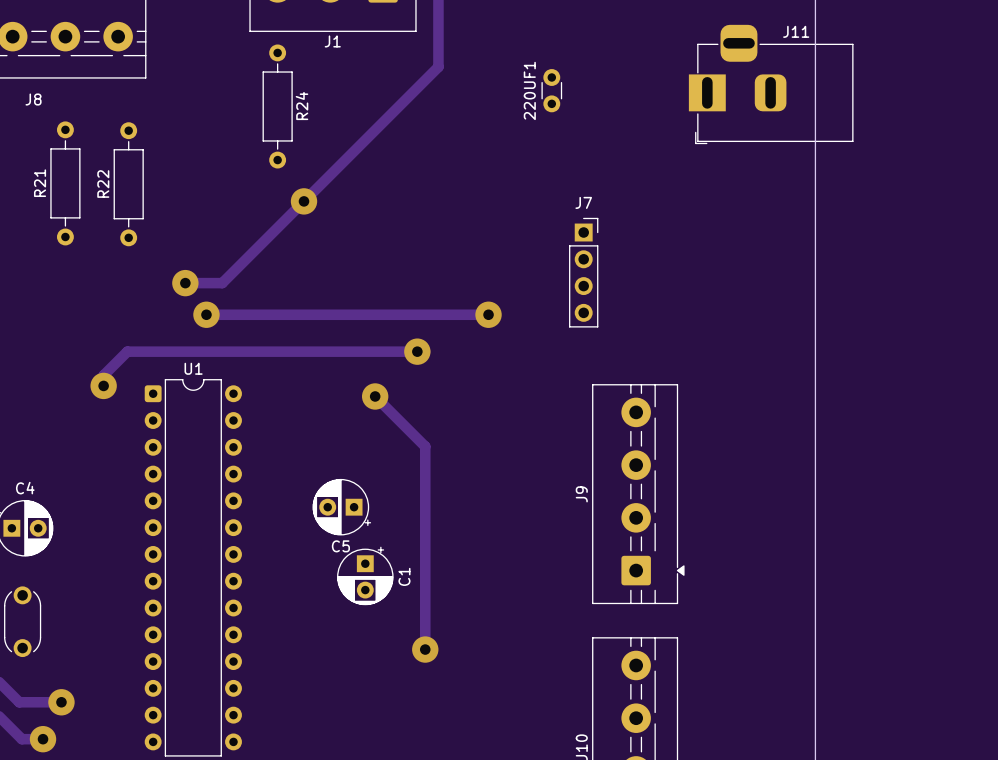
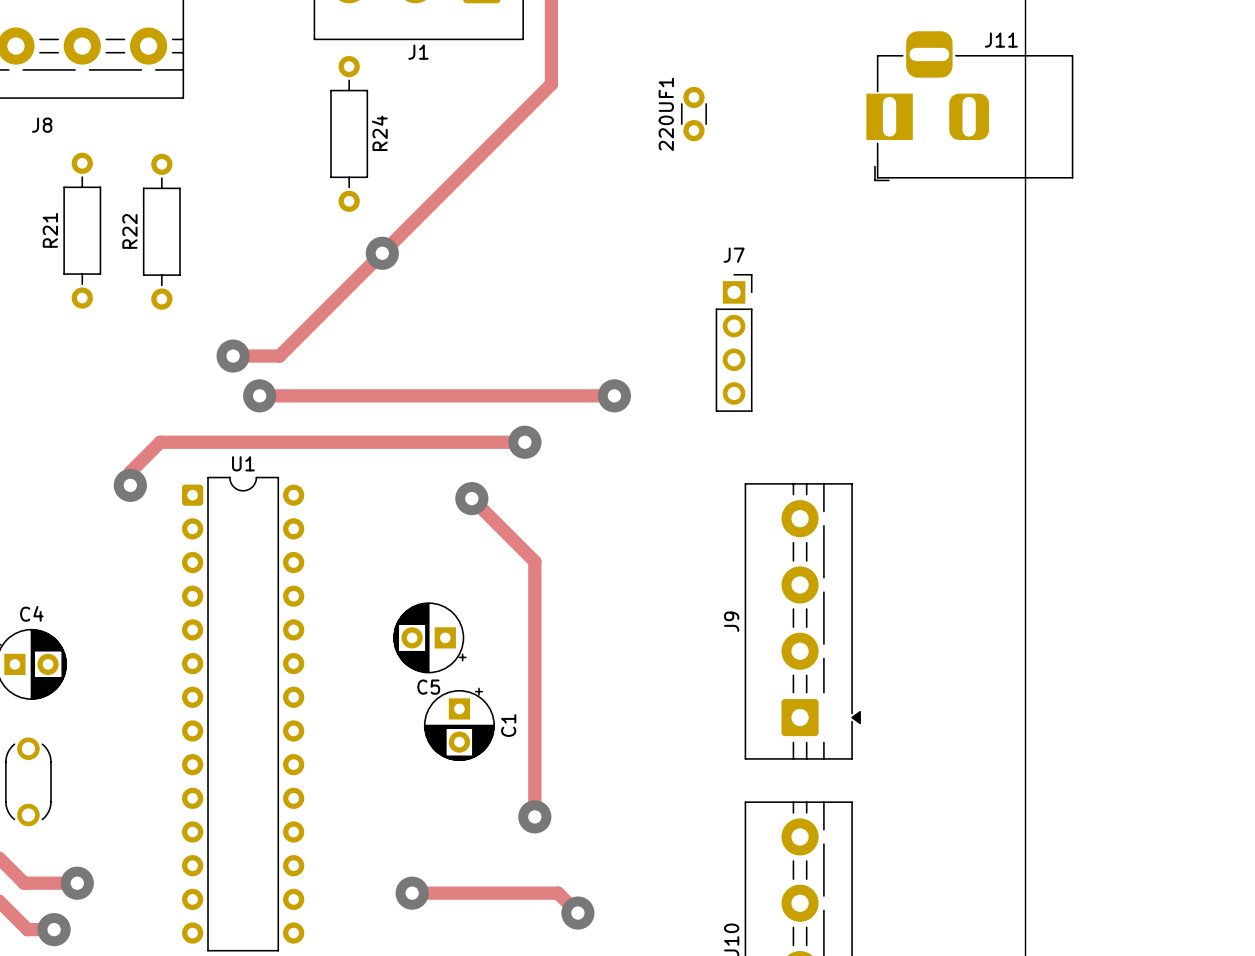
track: none -> (412, 893) (558, 893) (577, 913)
via: none -> (412, 893)
via: none -> (577, 913)

